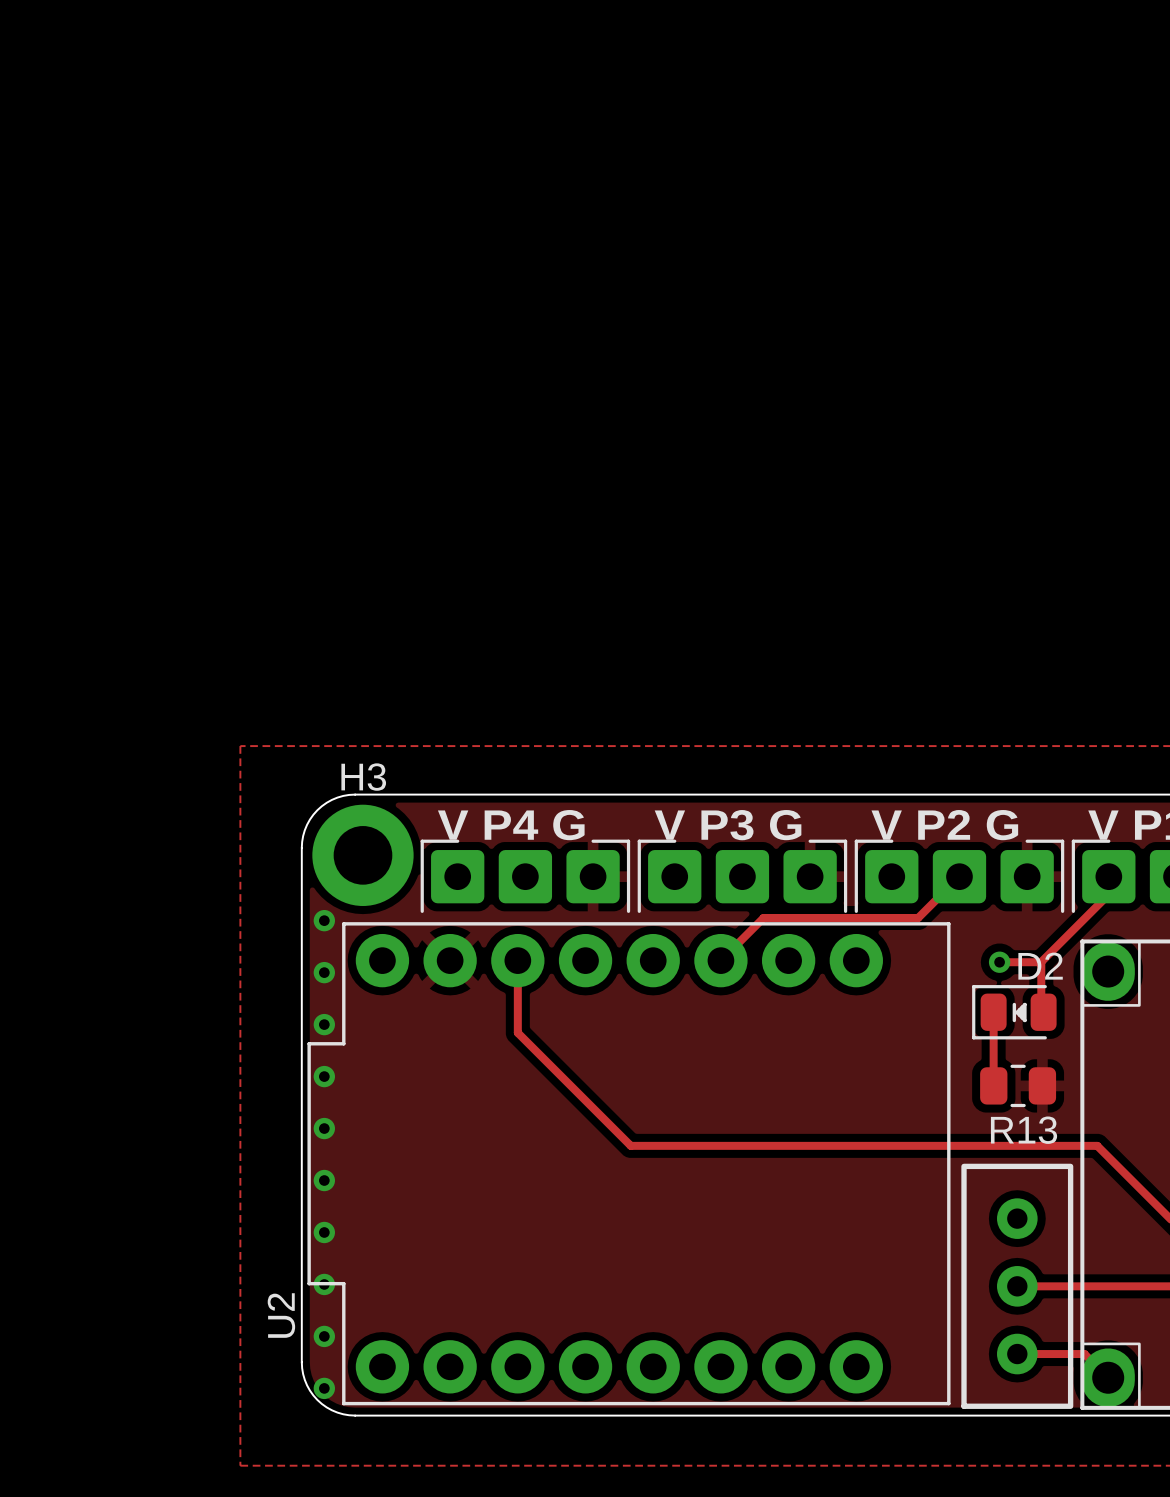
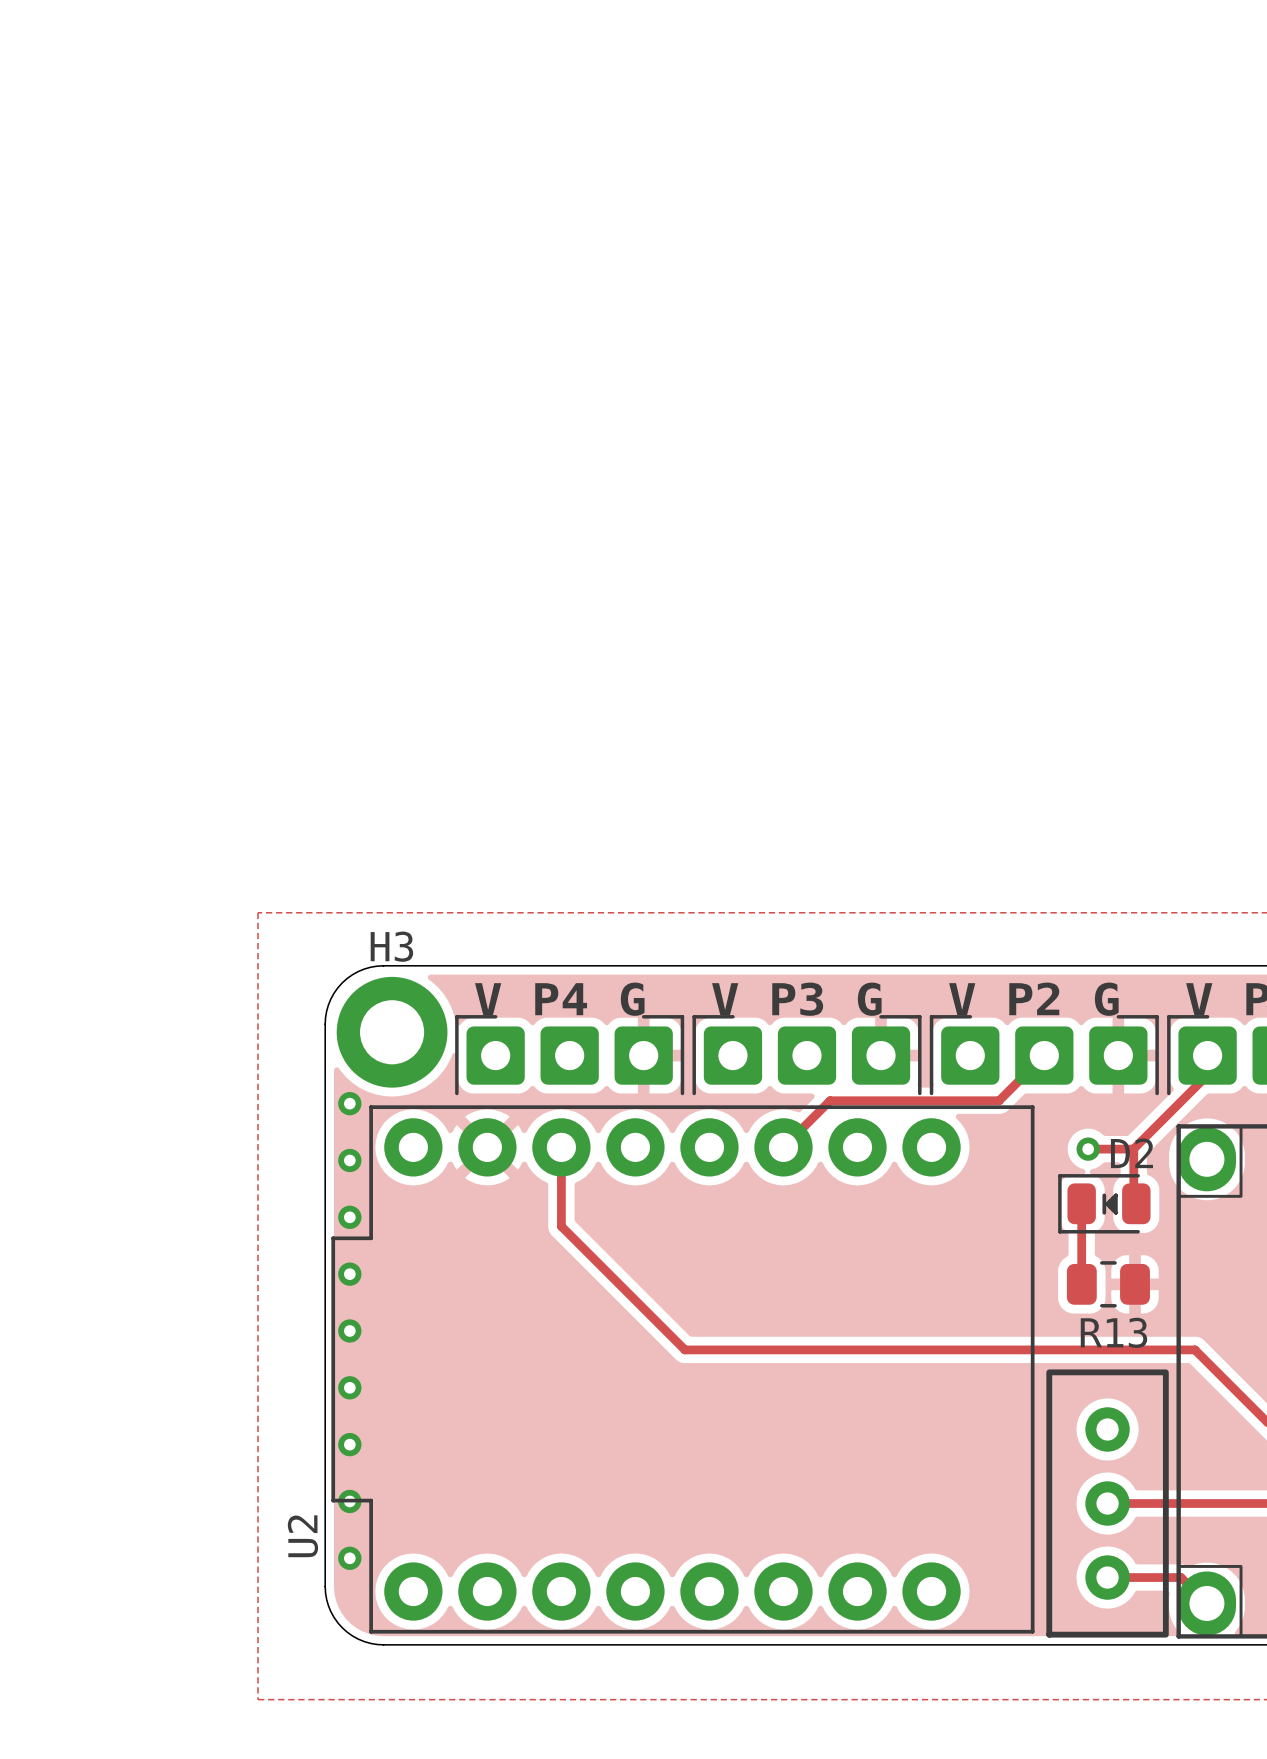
via: (324, 1388) -> none

